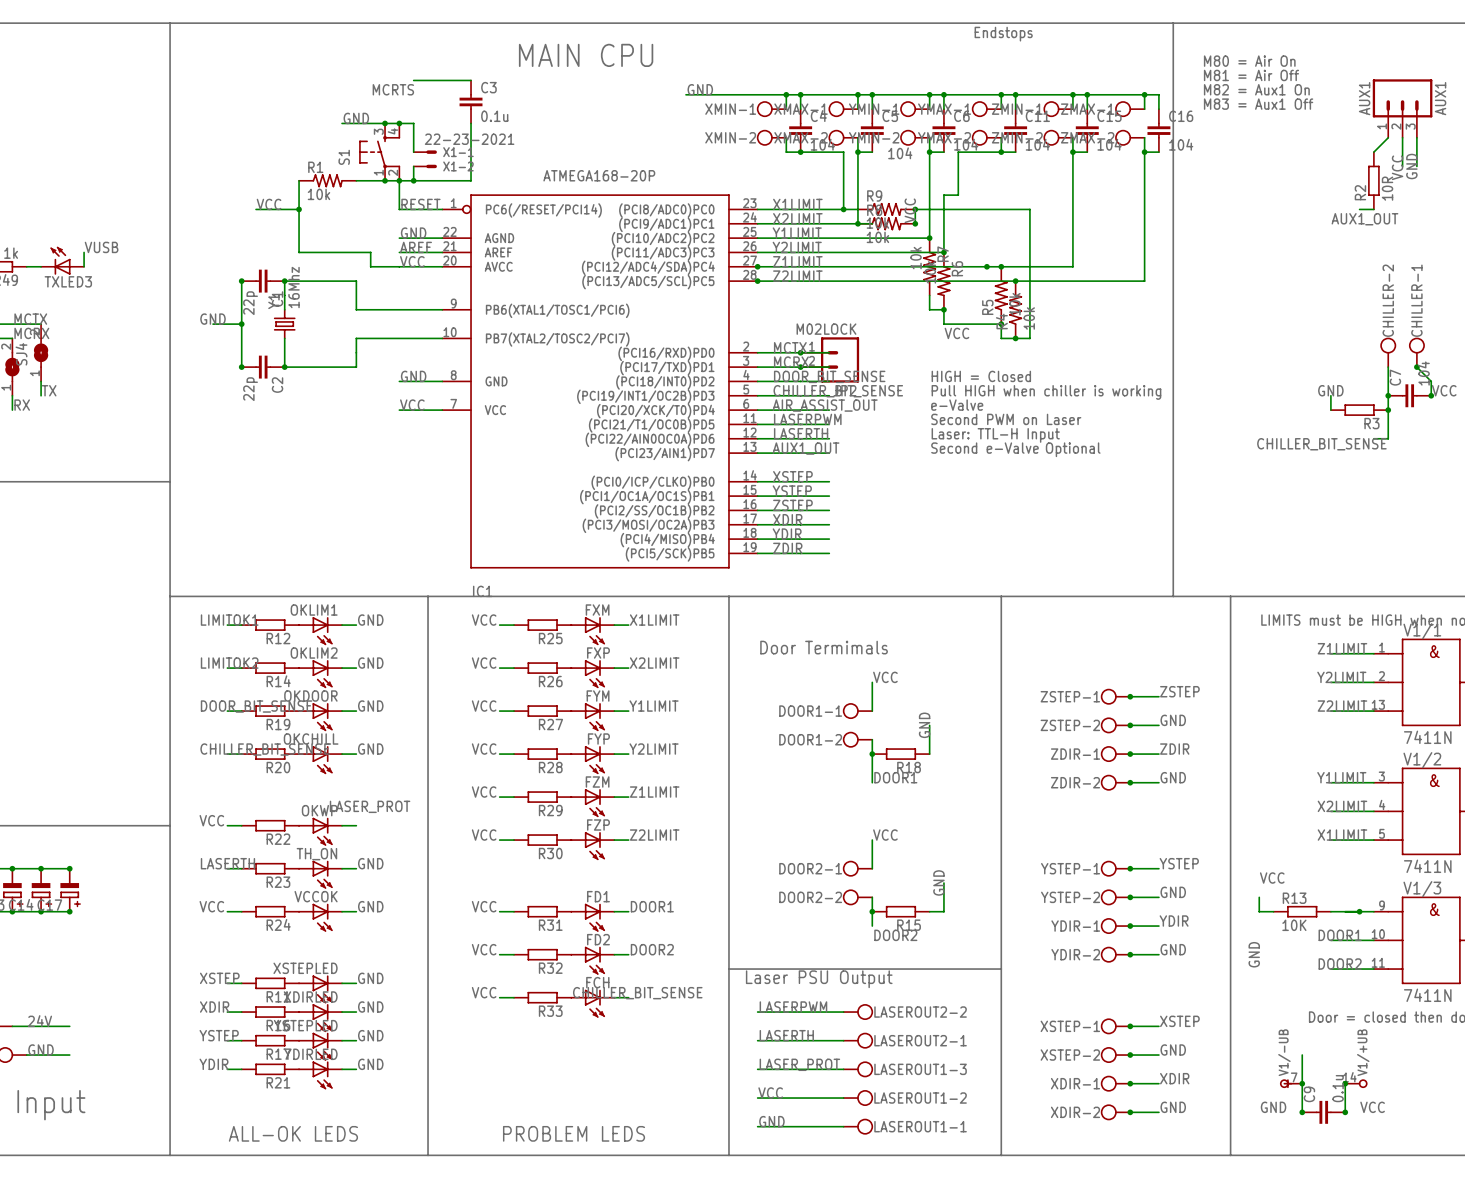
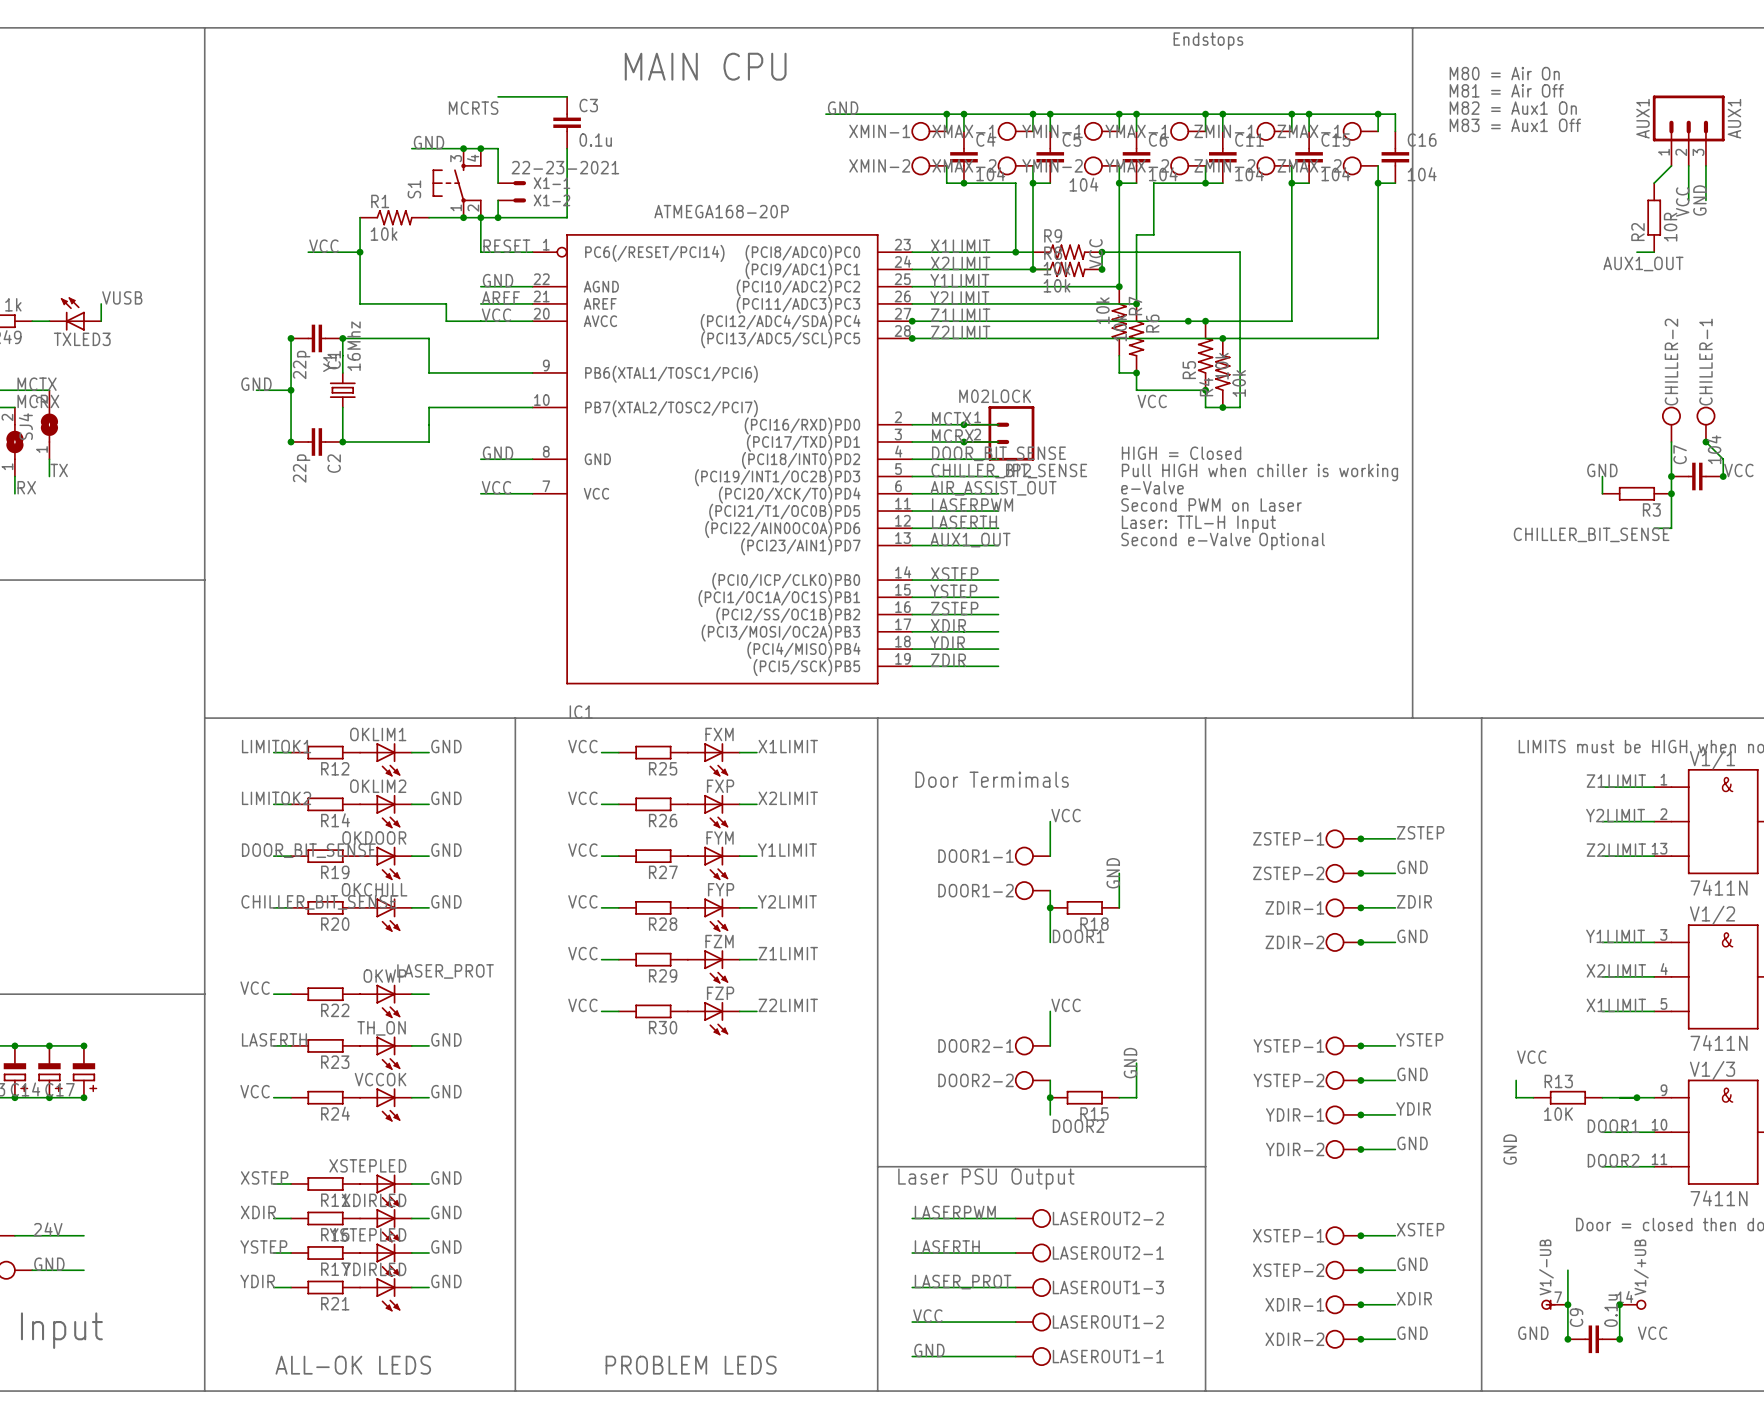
label: VCC (484, 906) -> none
label: DOOR1 (652, 906) -> none
wire: (499, 911) (514, 911) -> none
R31: (542, 911) -> none
wire: (614, 911) (628, 911) -> none
FD1: (592, 917) -> none
label: VCC (484, 949) -> none
label: DOOR2 (652, 949) -> none
wire: (499, 954) (514, 954) -> none
R32: (542, 954) -> none
wire: (614, 954) (628, 954) -> none
FD2: (592, 960) -> none
label: VCC (484, 992) -> none
label: CHILLER_BIT_SENSE (637, 993) -> none
wire: (499, 997) (514, 997) -> none
R33: (542, 997) -> none
wire: (614, 997) (628, 997) -> none
FCH: (592, 1003) -> none

